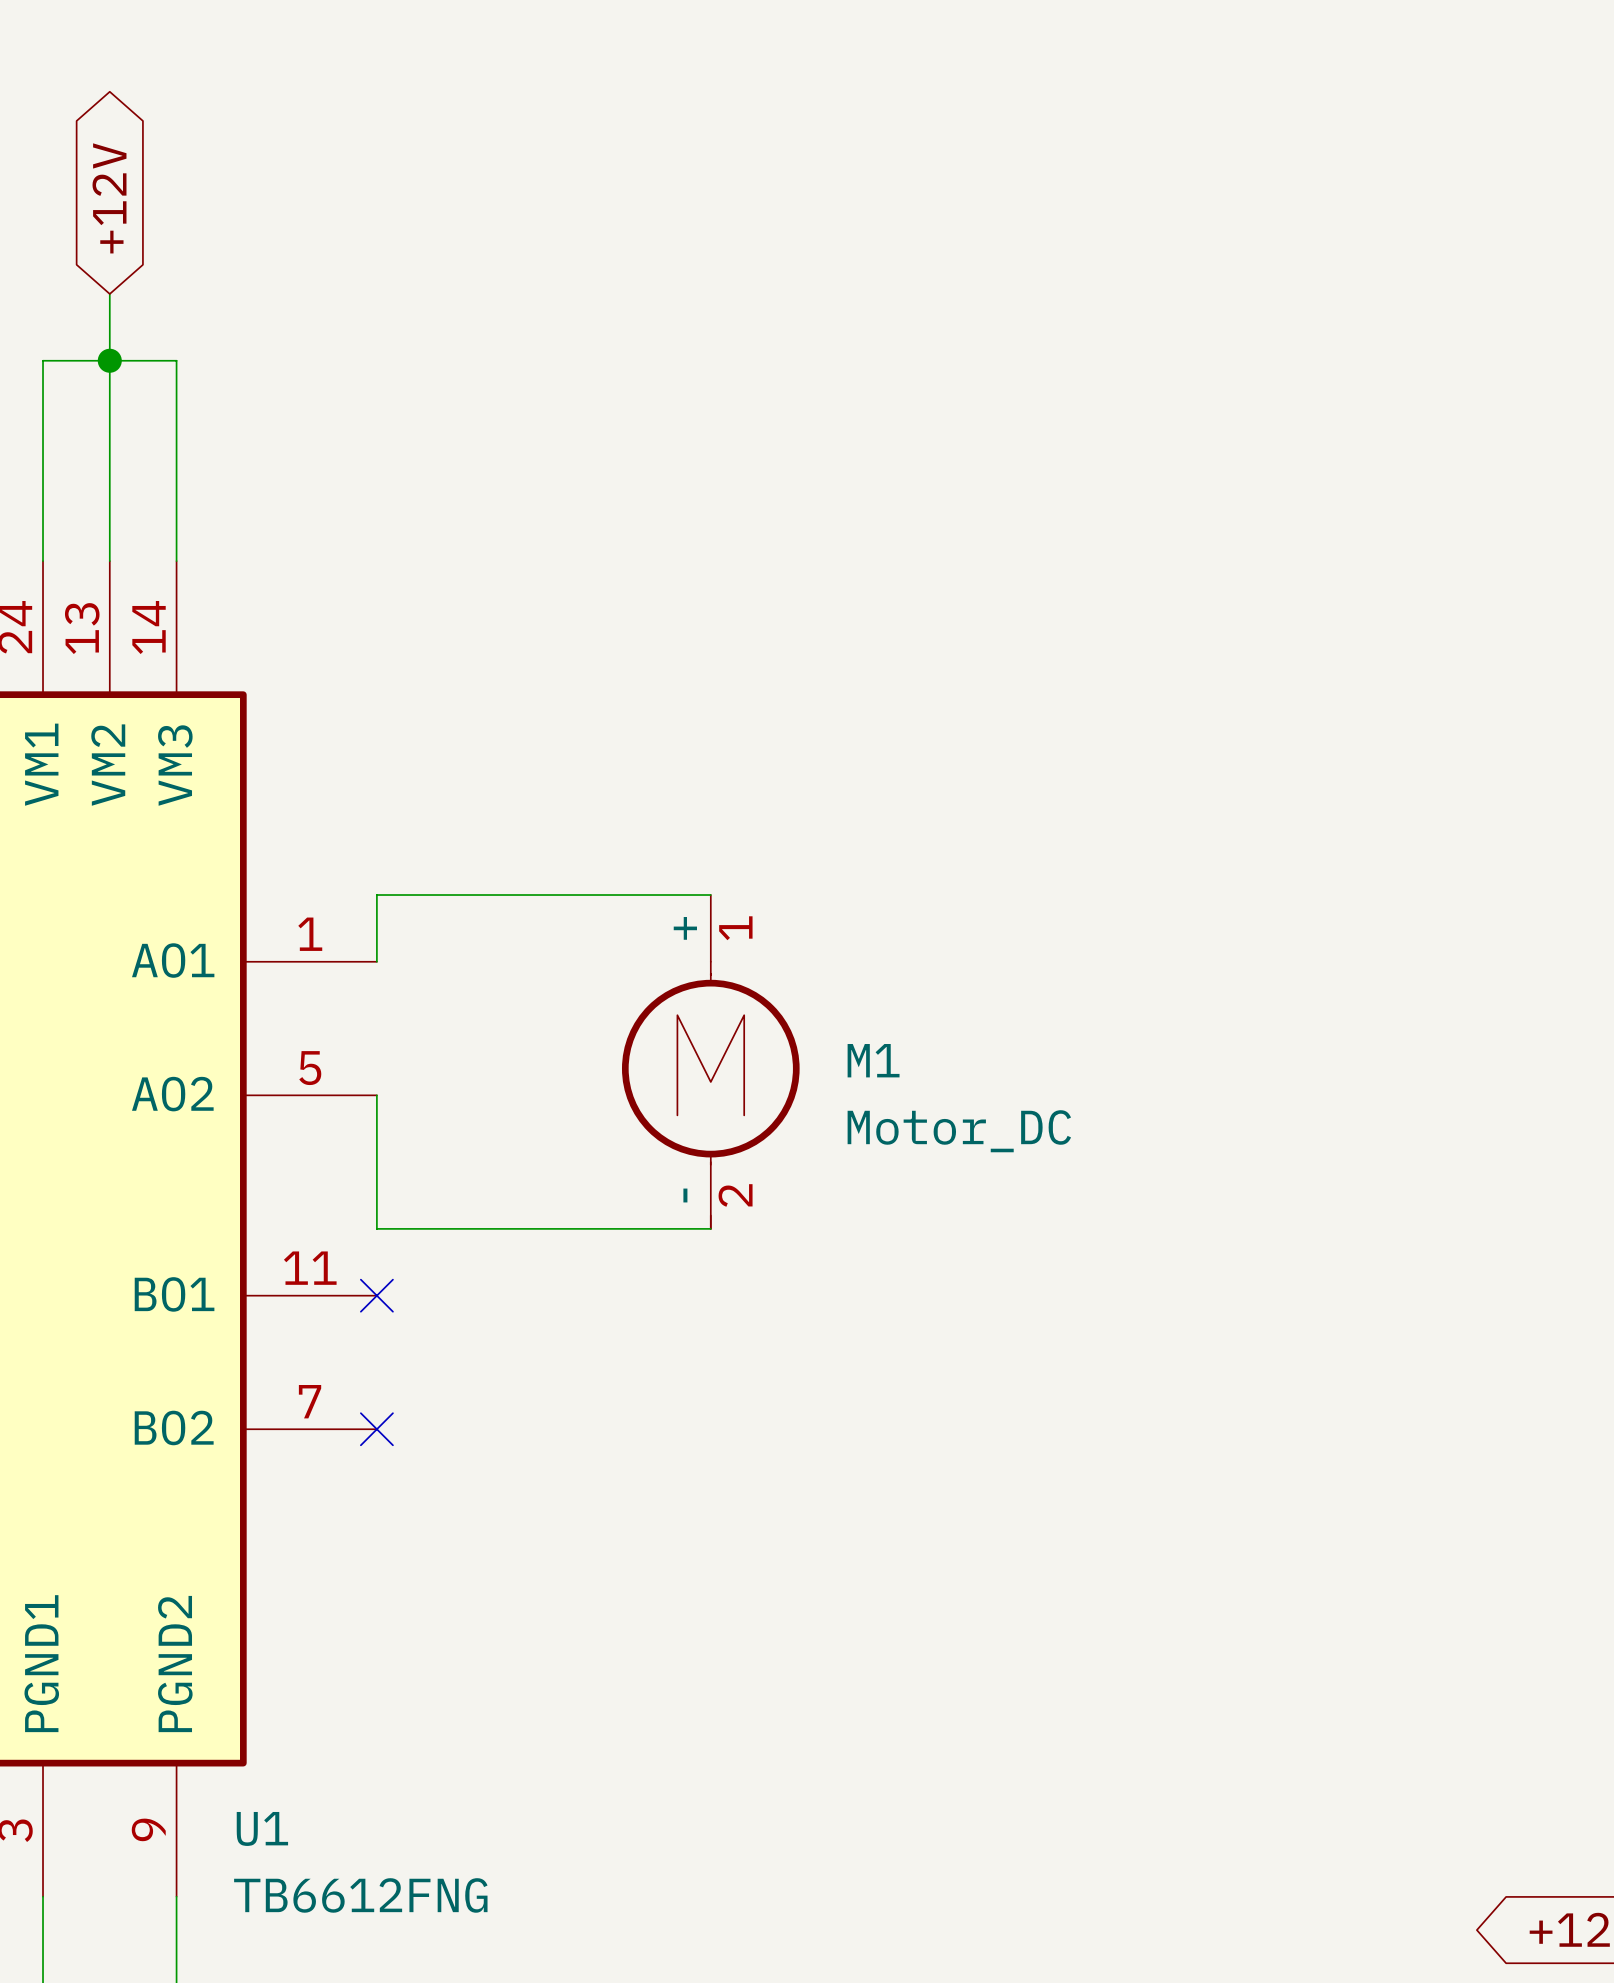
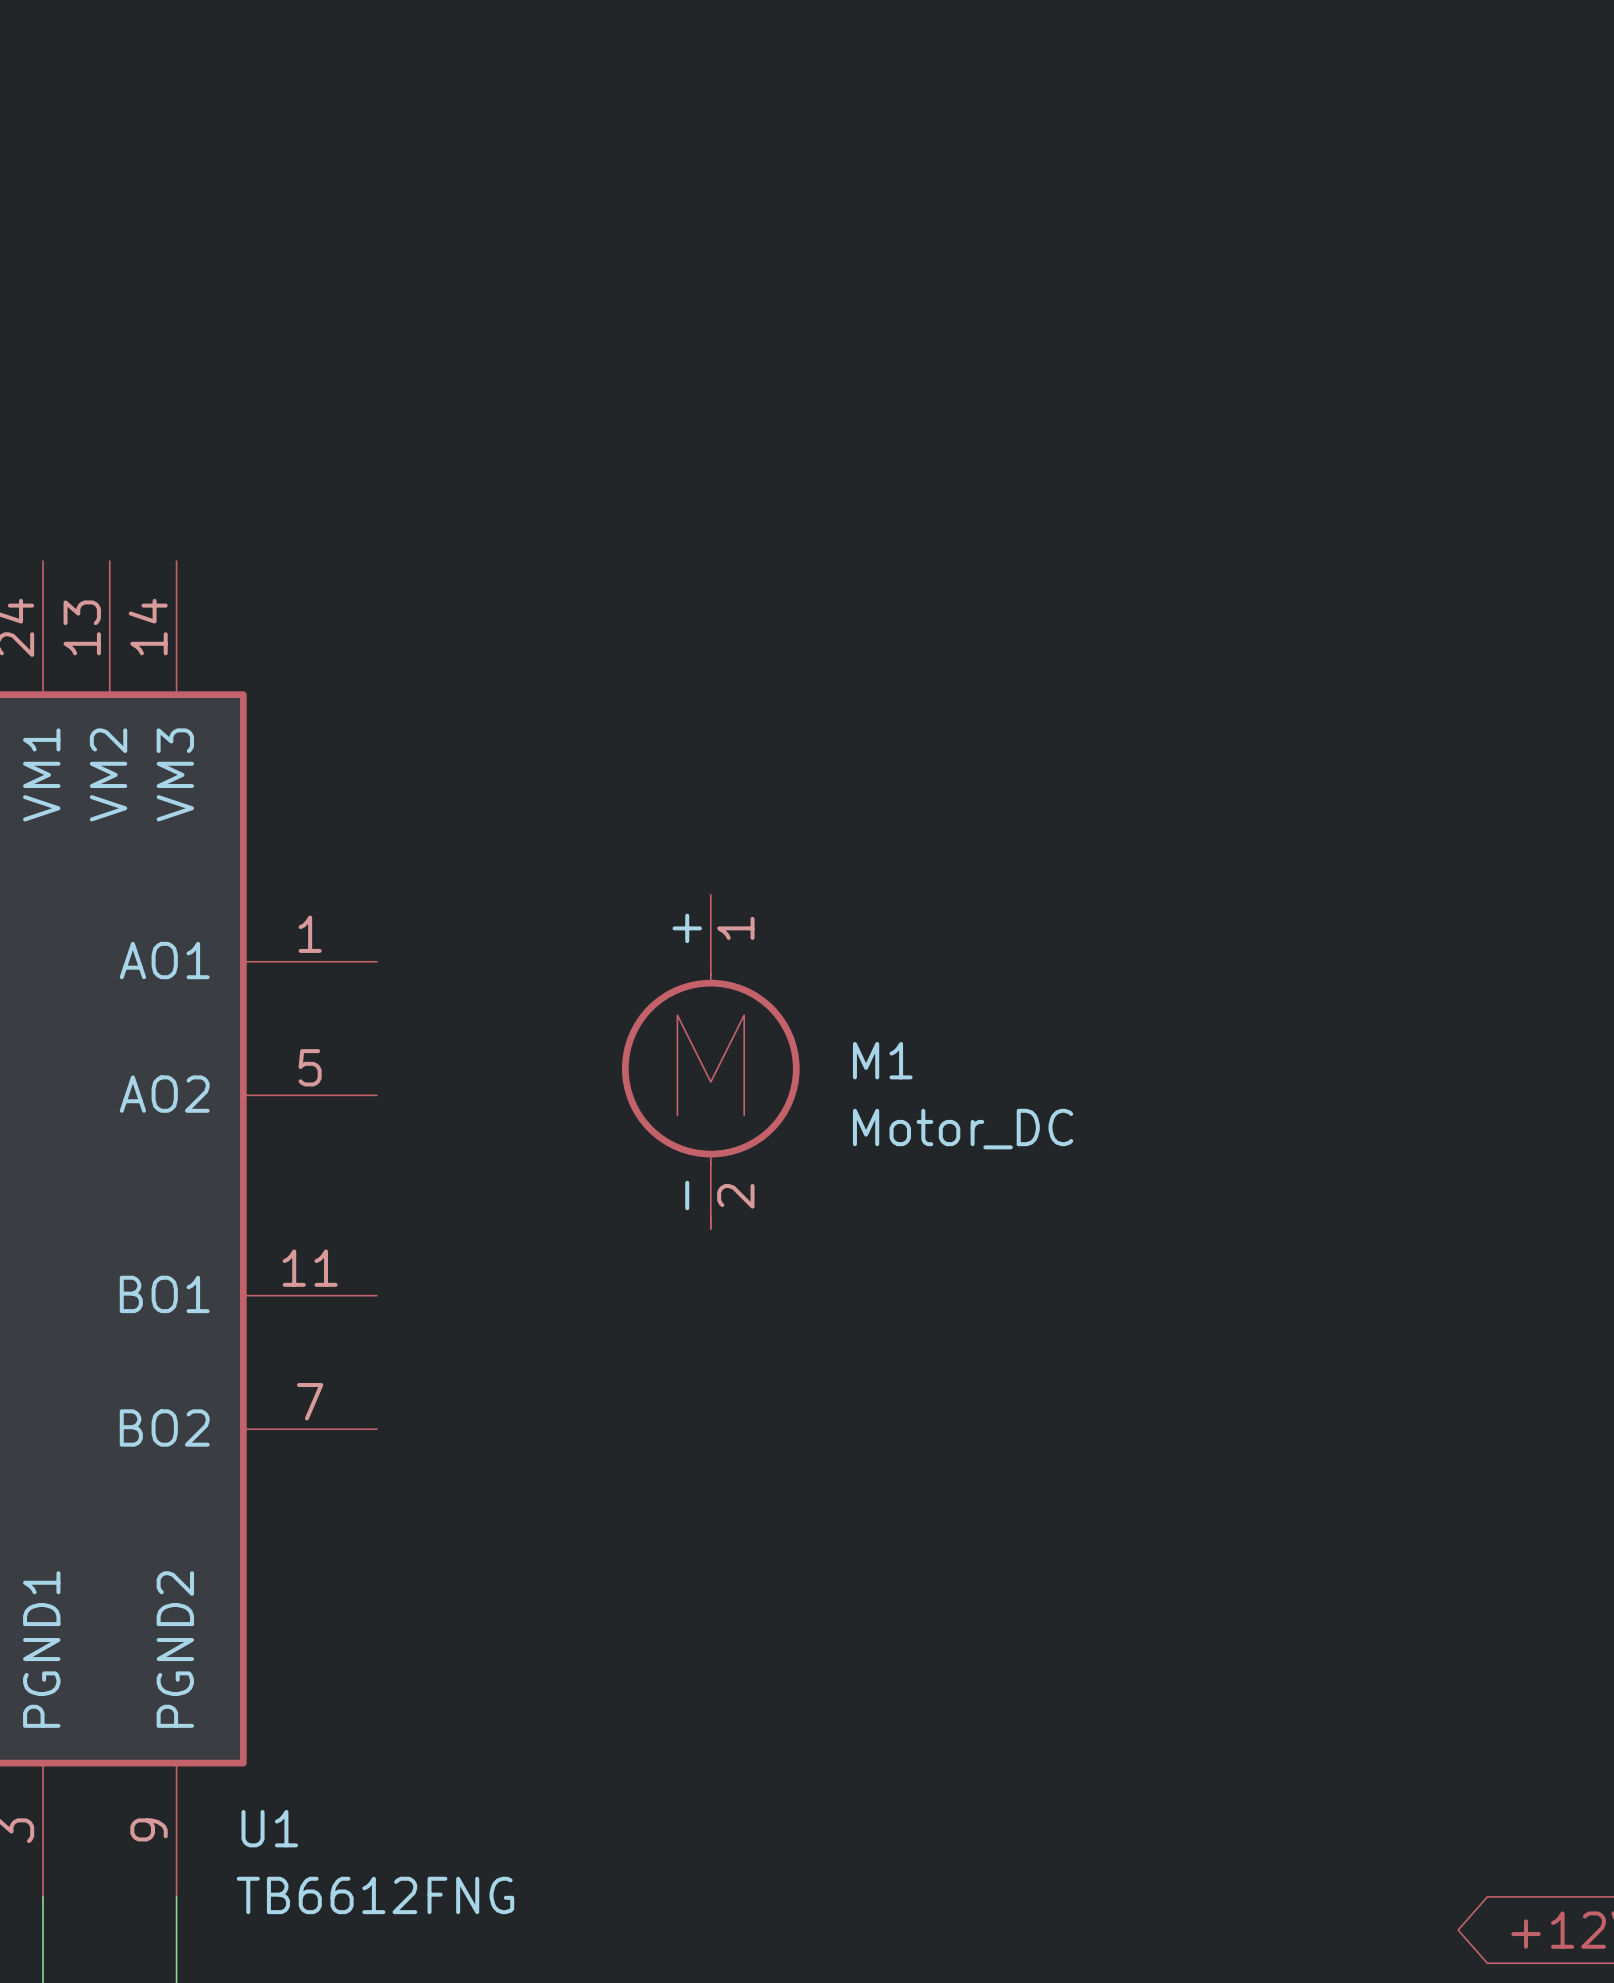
global label: +12V (109, 198) -> none
wire: (109, 293) (109, 561) -> none
junction: (109, 360) -> none
wire: (43, 561) (43, 360) (176, 360) (176, 561) -> none
wire: (710, 895) (376, 895) (376, 961) -> none
wire: (376, 1095) (376, 1228) (710, 1228) -> none
no-connect mark: (376, 1295) -> none
no-connect mark: (376, 1429) -> none

